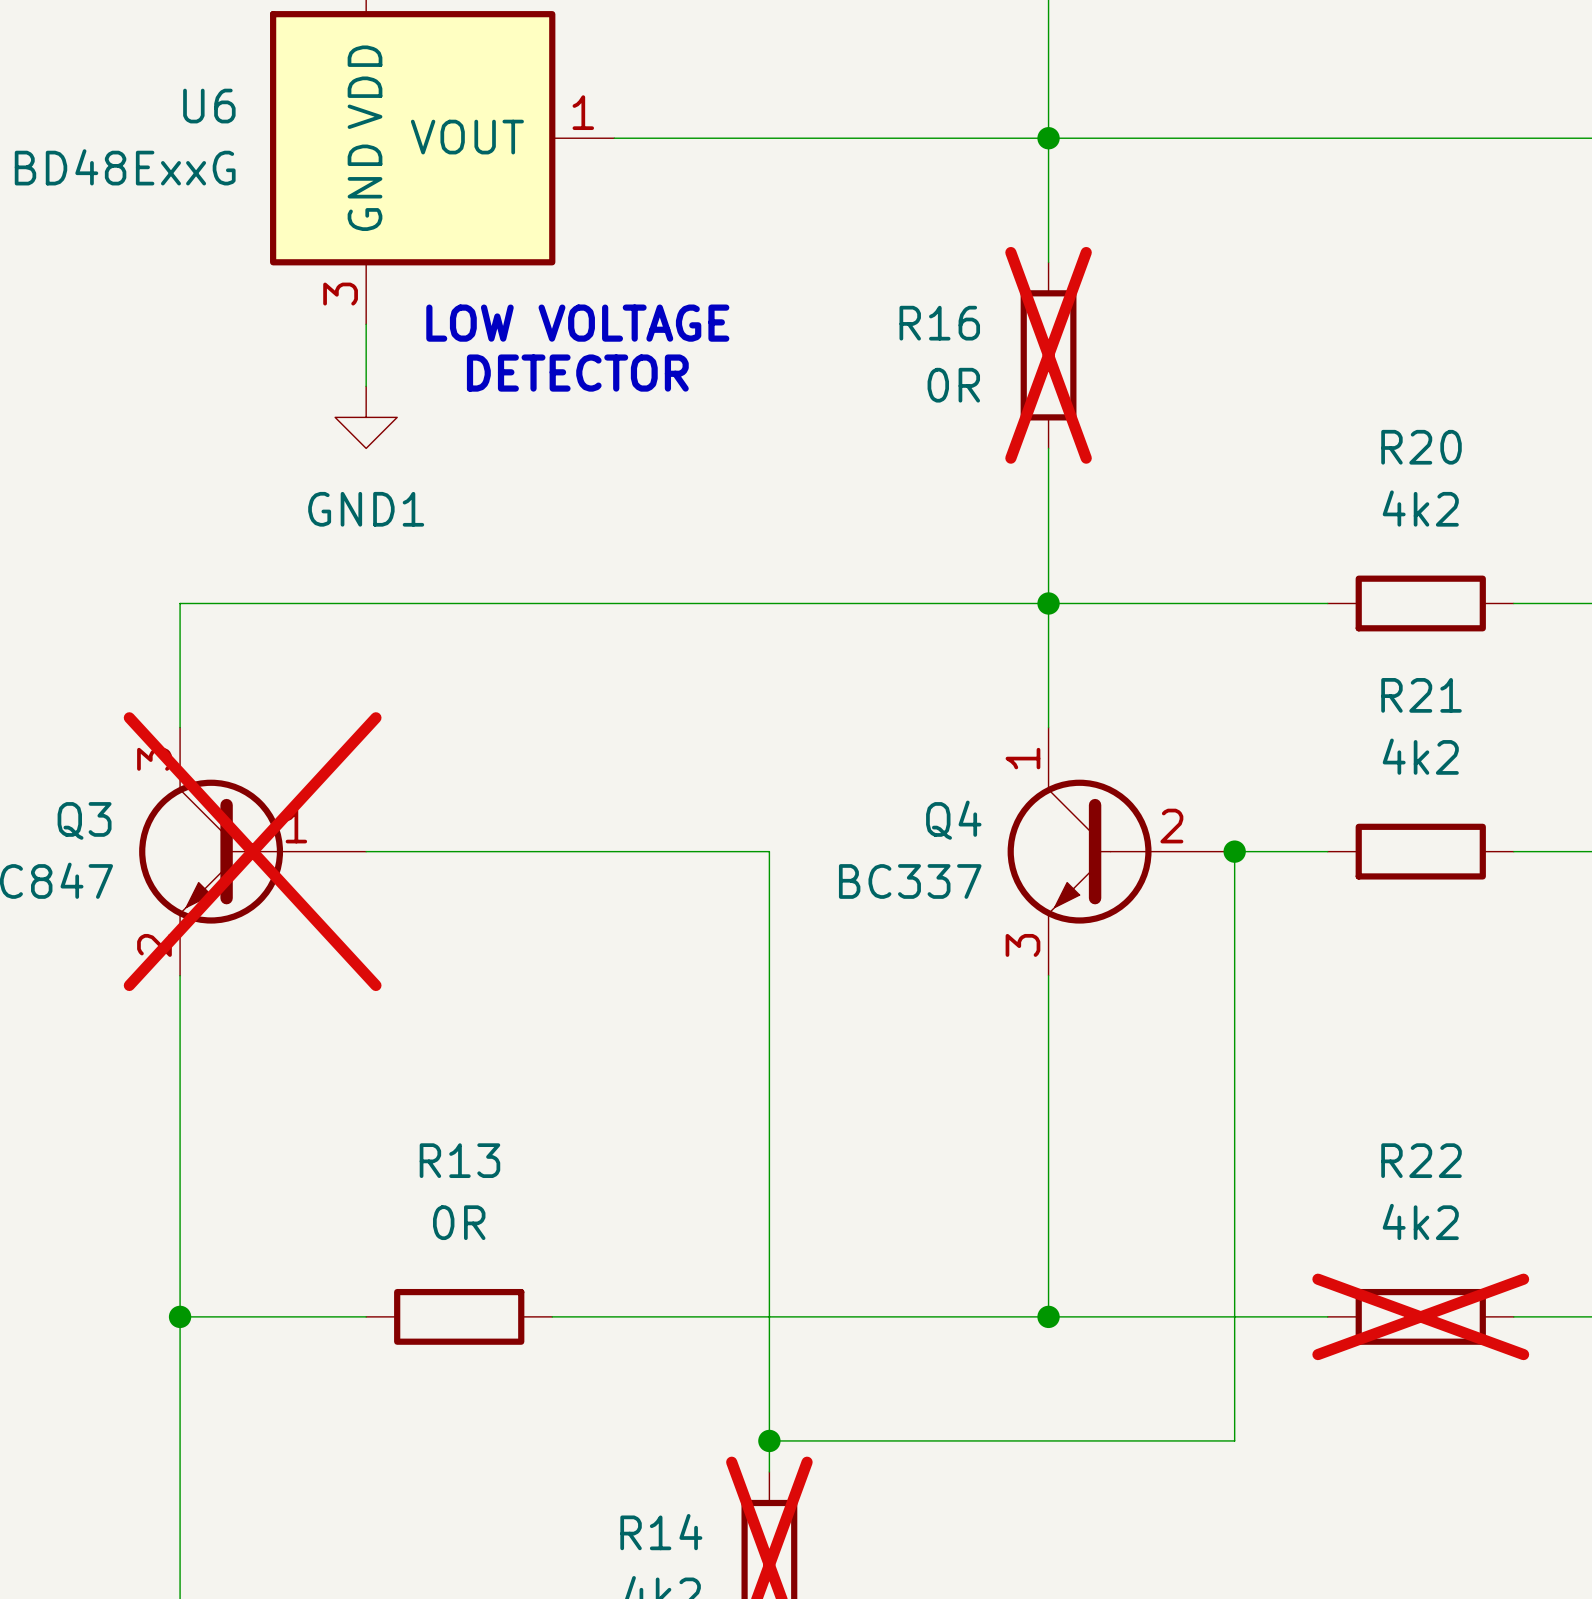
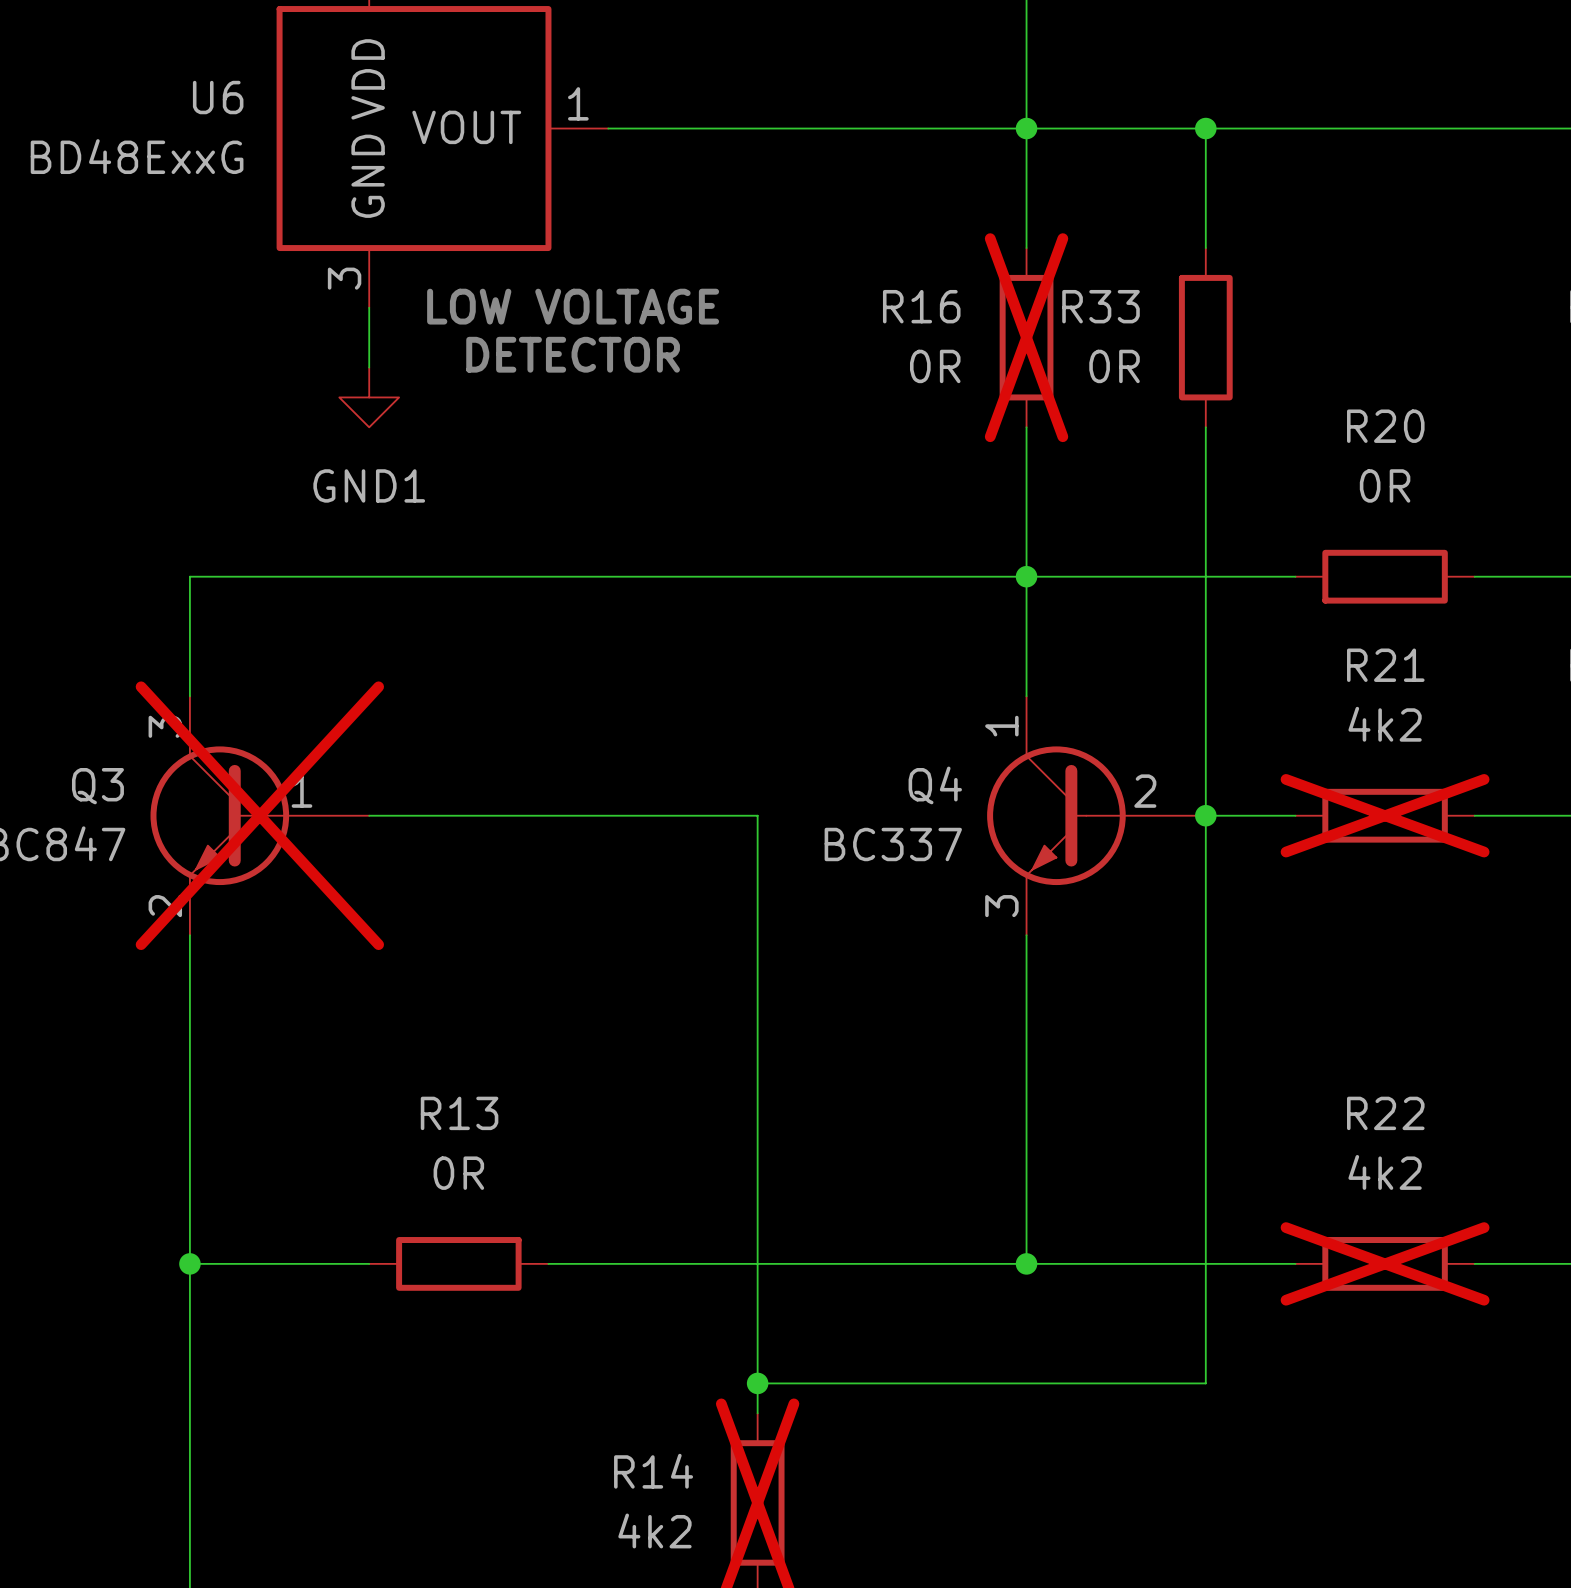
wire: none -> (1205, 128) (1205, 248)
junction: none -> (1205, 128)
R33: none -> 0R (1205, 337)
wire: none -> (1205, 427) (1205, 815)
R20 value: 4k2 (1420, 508) -> 0R (1385, 485)
R21 do-not-place cross: none -> (1385, 815)

